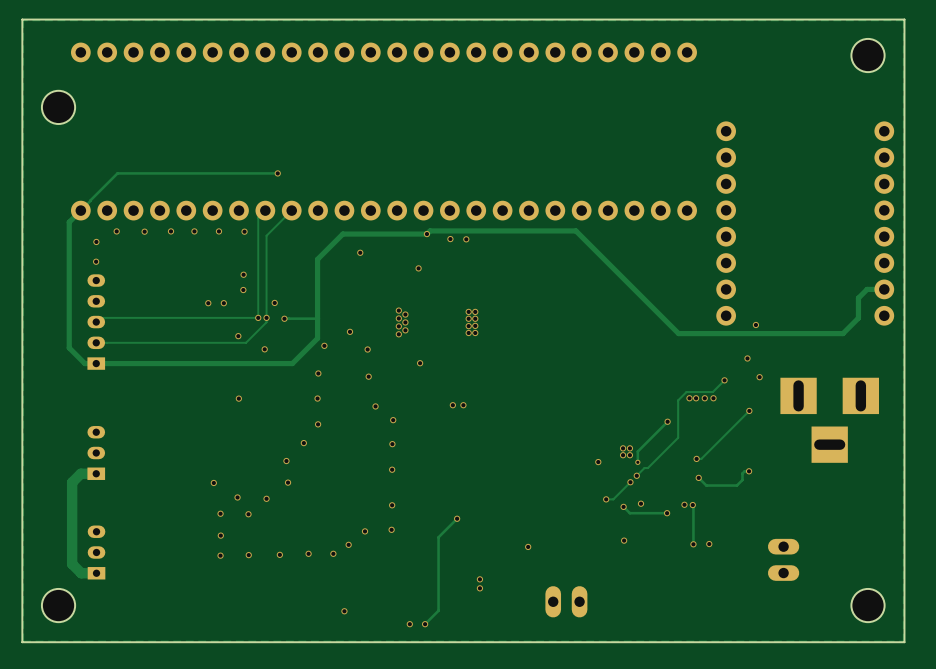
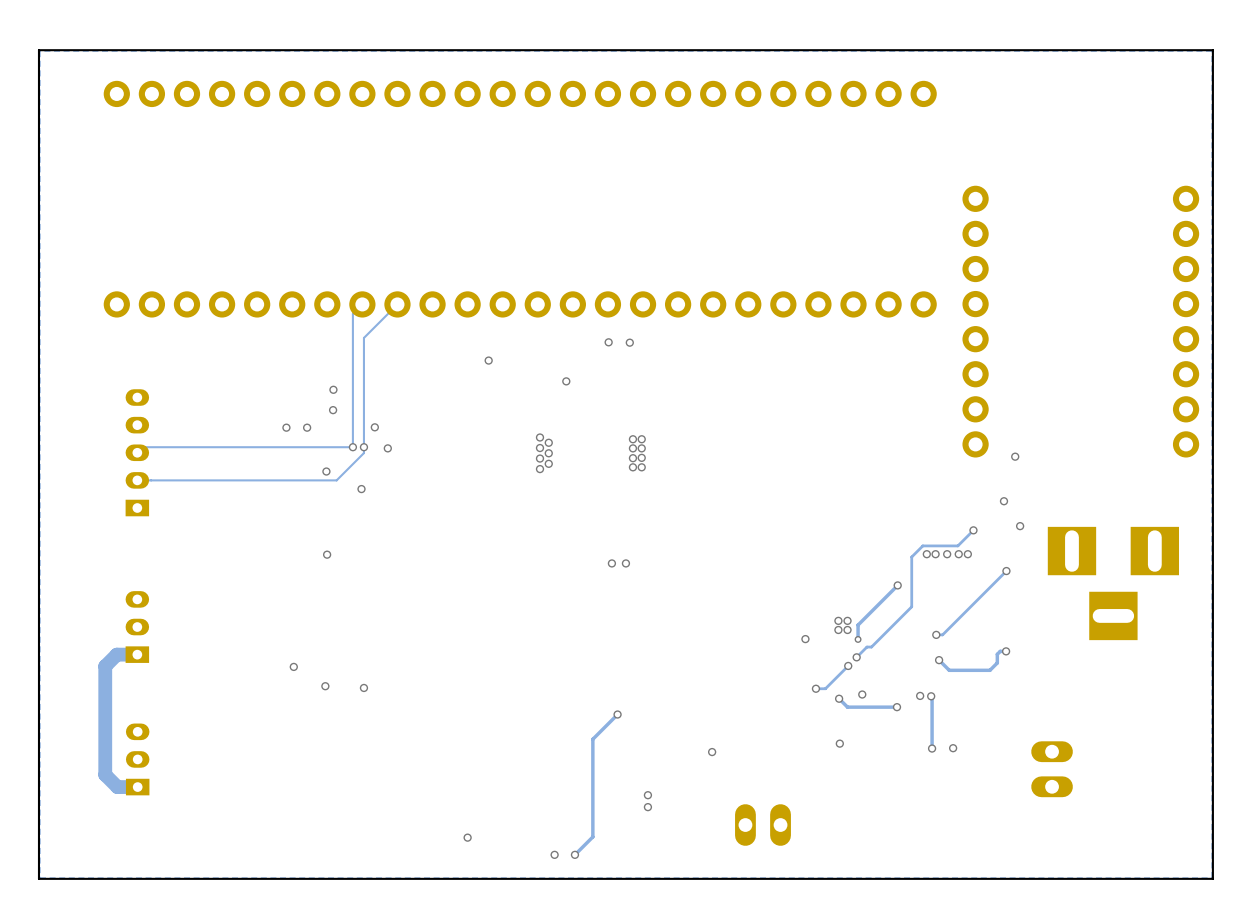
part: (868, 55) -> none
part: (58, 107) -> none
track: (277, 173) (117, 173) (69, 222) (69, 347) (84, 363) (292, 363) (317, 338) (317, 259) (342, 234) (426, 234) (430, 230) (575, 230) (678, 333) (843, 333) (858, 318) (858, 298) (867, 289) (884, 289) -> none
via: (277, 173) -> none
via: (116, 231) -> none
via: (144, 231) -> none
via: (170, 231) -> none
via: (194, 231) -> none
via: (218, 231) -> none
via: (244, 231) -> none
via: (426, 234) -> none
via: (96, 241) -> none
via: (96, 261) -> none
track: (317, 318) (288, 318) -> none
via: (349, 331) -> none
via: (324, 345) -> none
via: (367, 349) -> none
via: (420, 363) -> none
via: (318, 373) -> none
via: (368, 376) -> none
via: (317, 398) -> none
via: none -> (967, 554)
via: (375, 406) -> none
via: (393, 420) -> none
via: (318, 424) -> none
via: (303, 443) -> none
via: (392, 444) -> none
via: (286, 461) -> none
via: (392, 469) -> none
via: (288, 482) -> none
via: (392, 505) -> none
via: (220, 513) -> none
via: (248, 514) -> none
via: (391, 529) -> none
via: (365, 531) -> none
via: (220, 535) -> none
via: (348, 544) -> none
via: (308, 553) -> none
via: (333, 553) -> none
via: (279, 554) -> none
via: (220, 555) -> none
via: (248, 555) -> none
part: (58, 605) -> none
part: (868, 605) -> none

